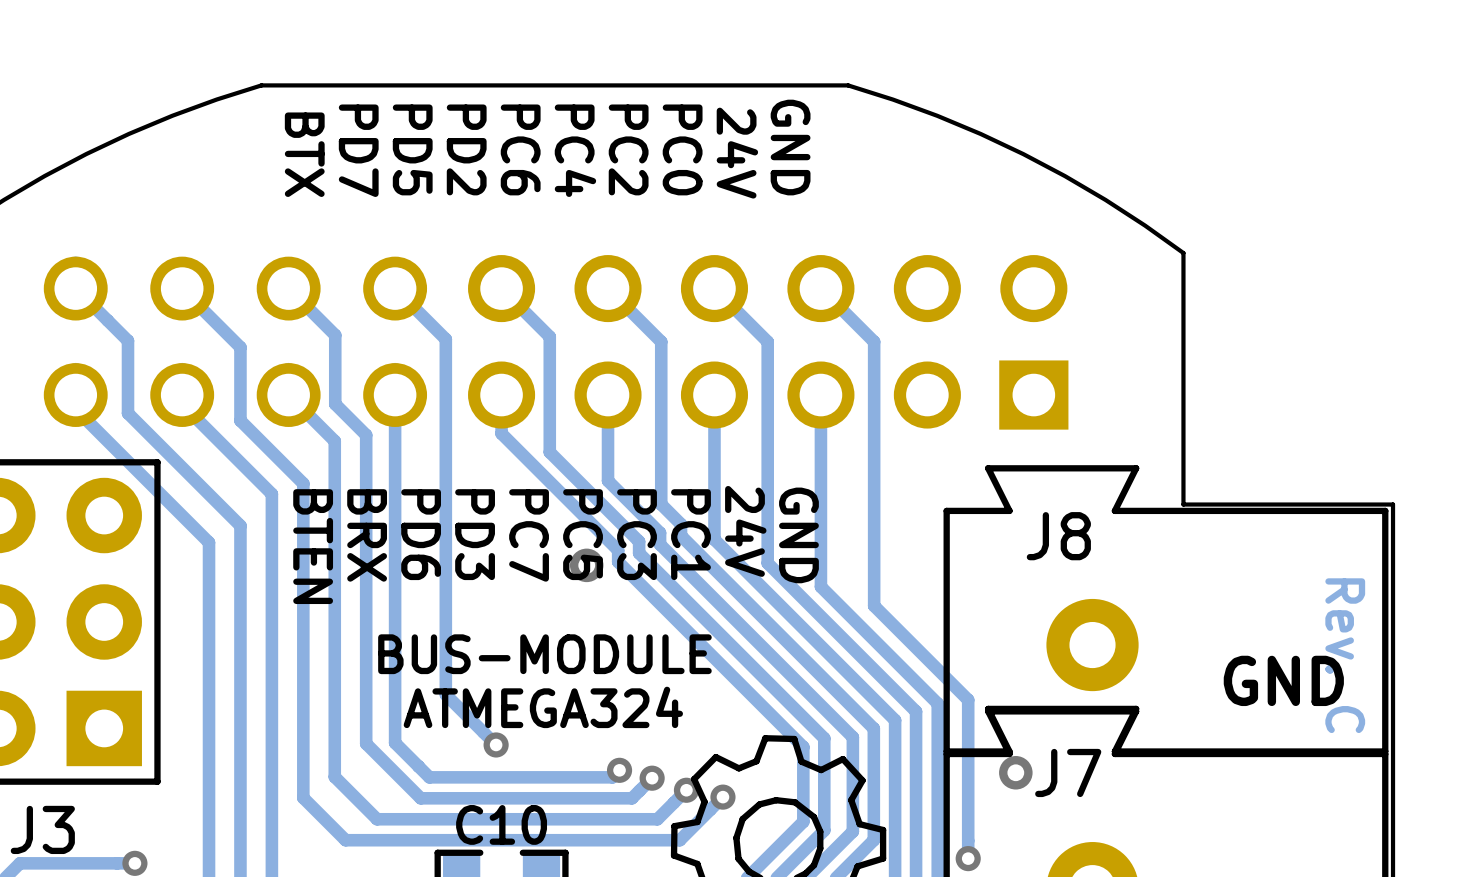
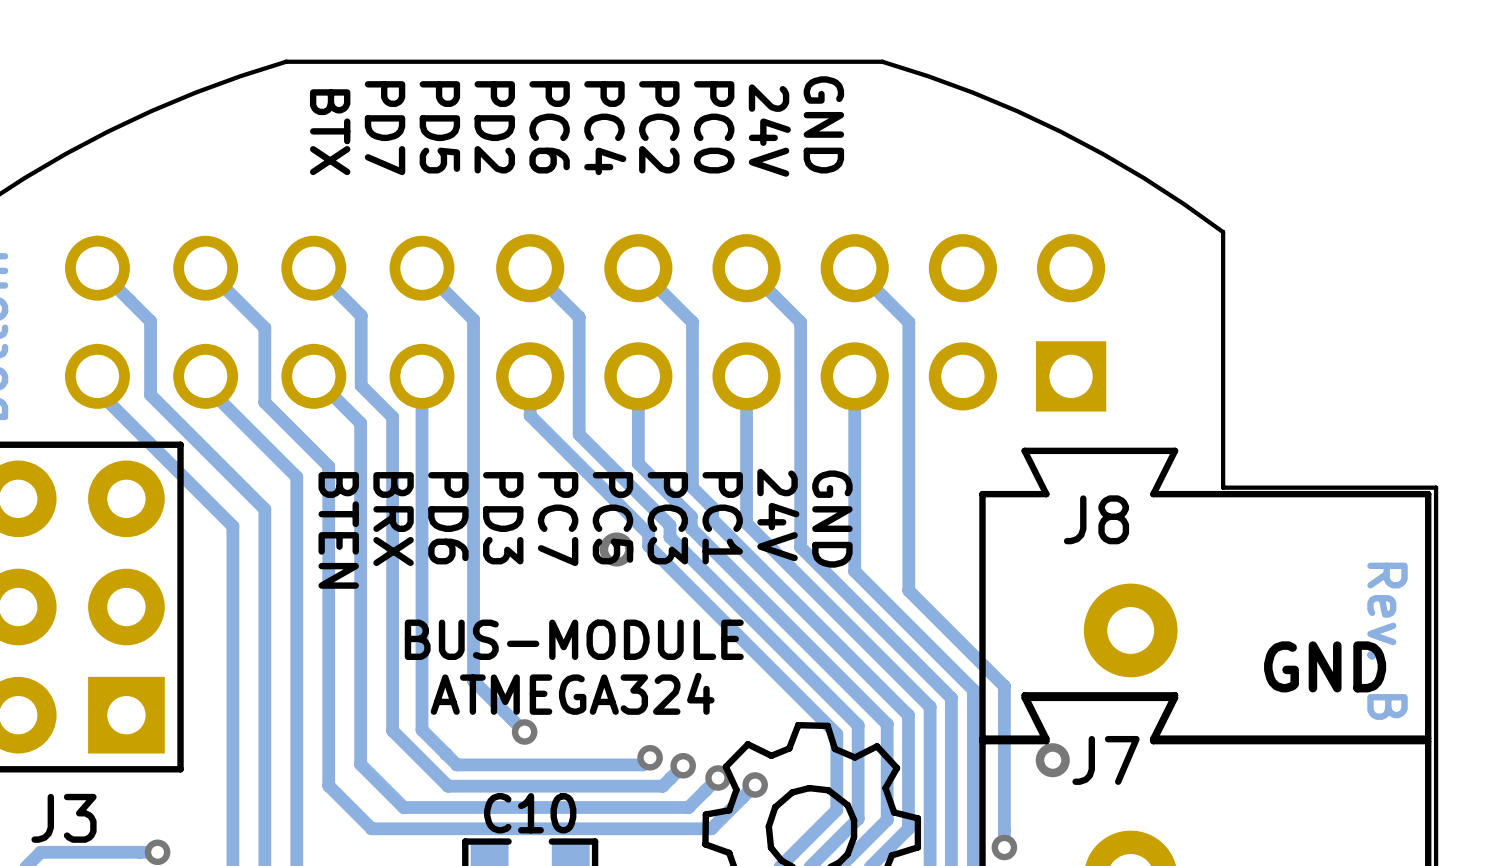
text: Rev. C (1345, 655) -> Rev. B (1387, 641)

